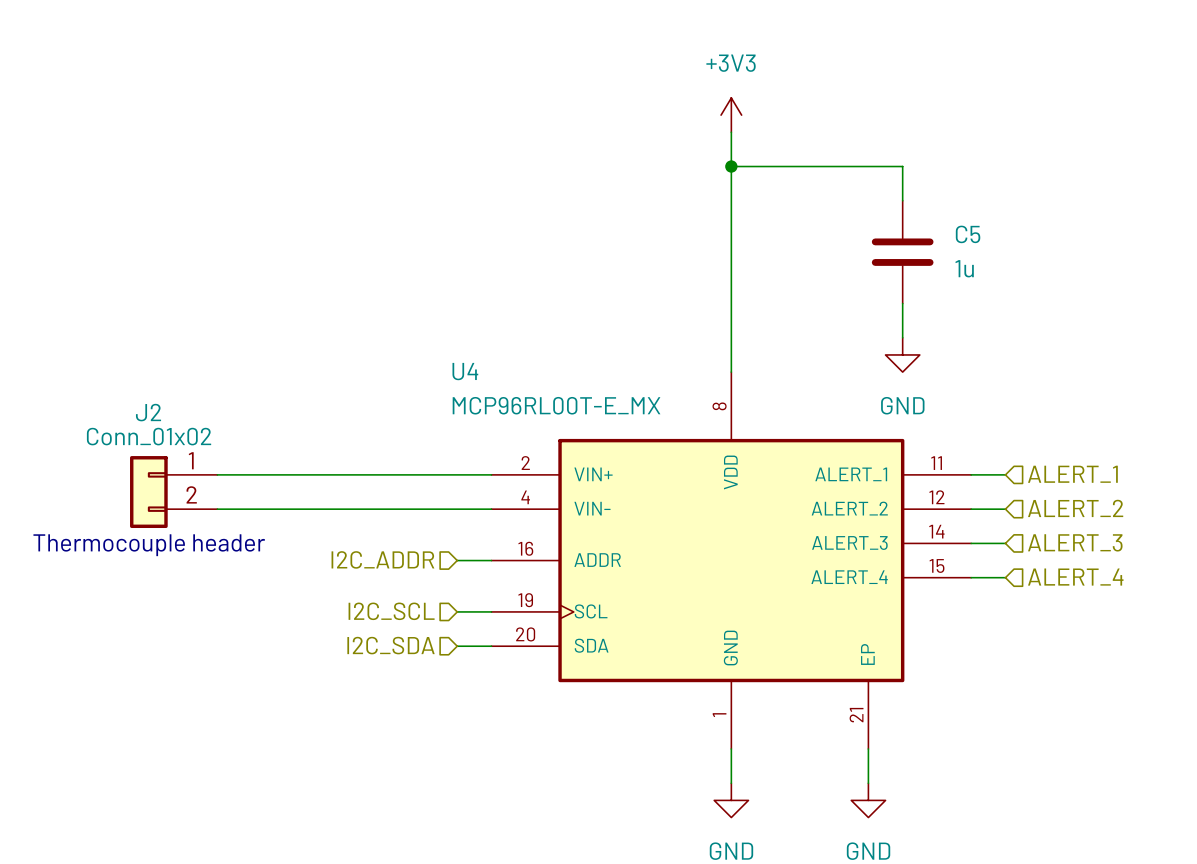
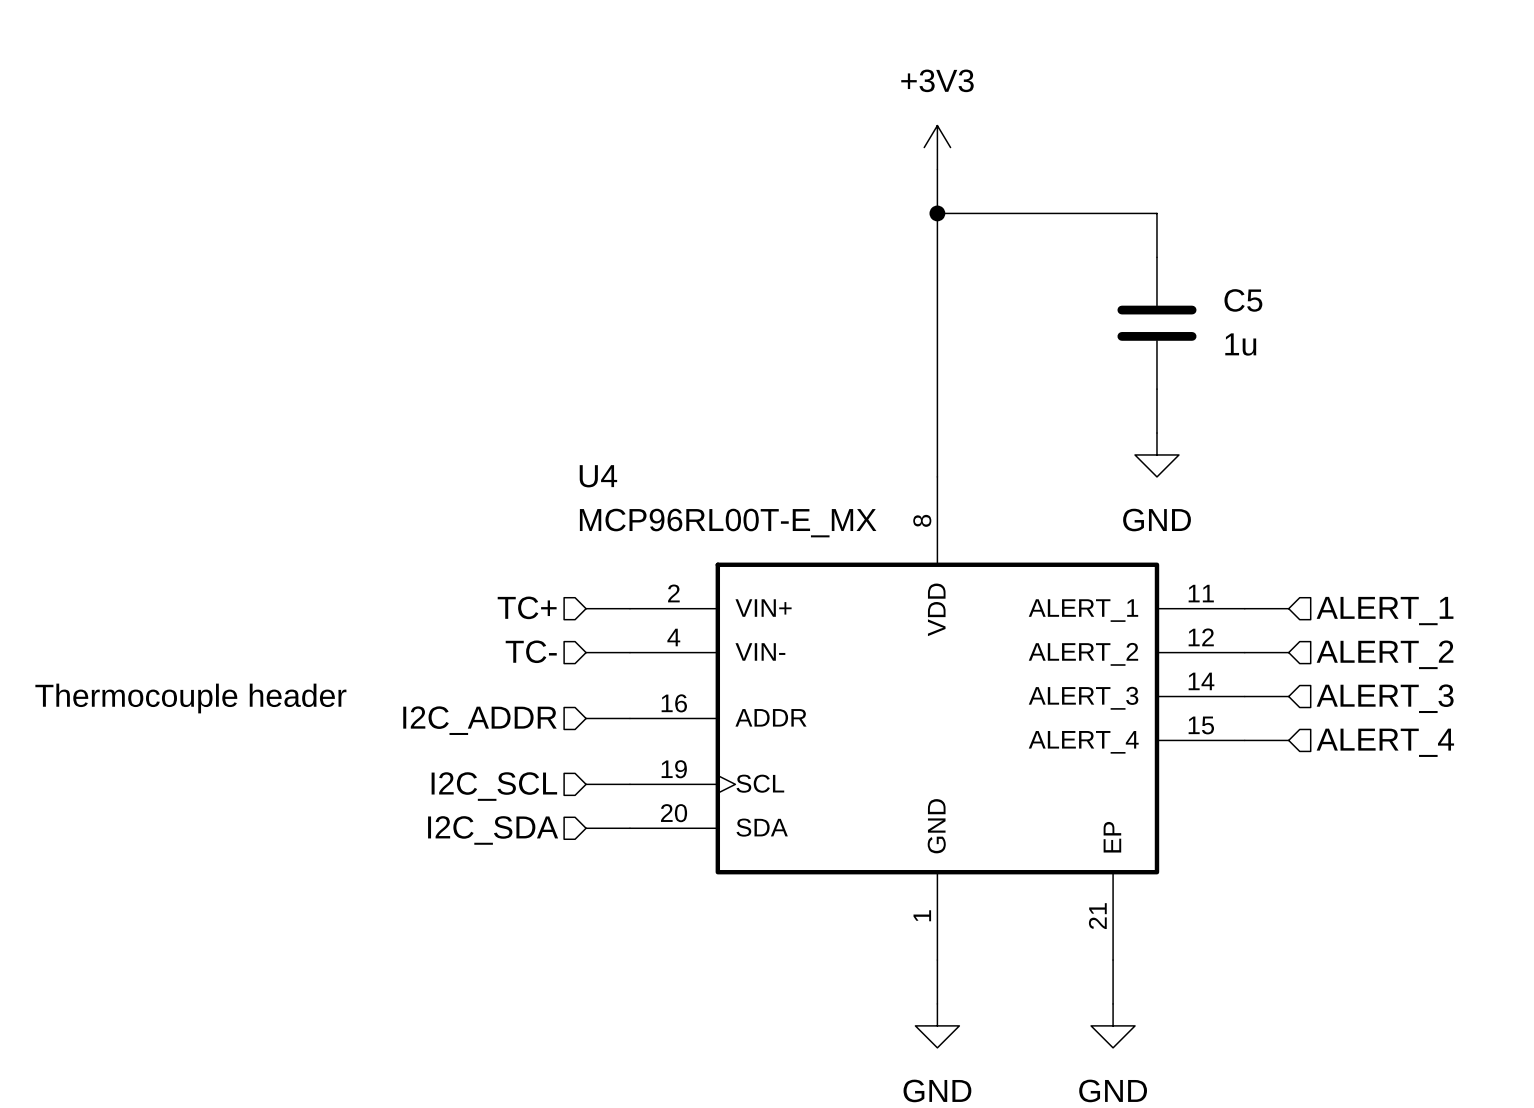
wire: (217, 474) (457, 474) -> none
hierarchical label: none -> TC+ (527, 607)
J2: Conn_01x02 (173, 492) -> none
hierarchical label: none -> TC- (531, 651)
wire: (217, 509) (457, 509) -> none

